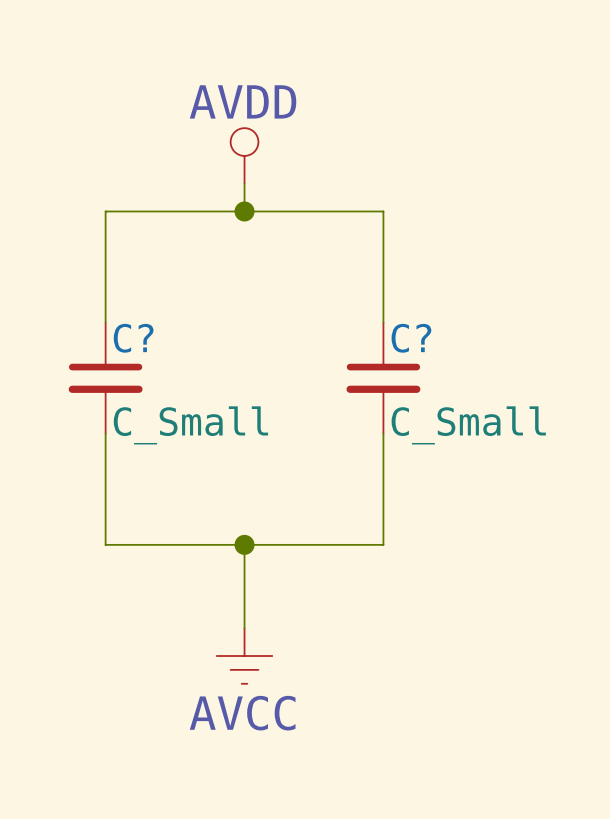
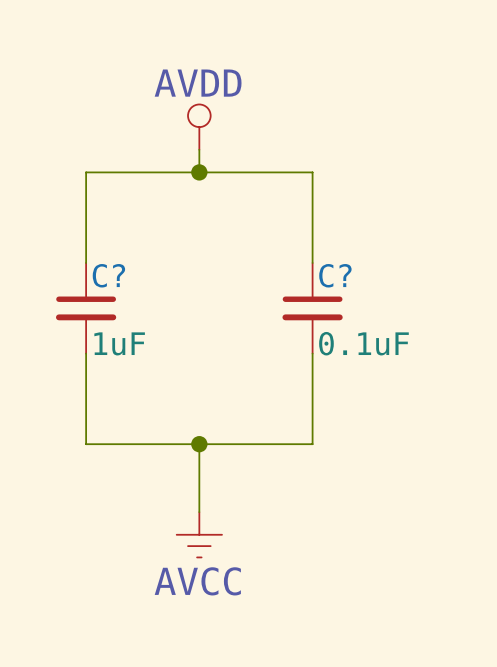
C? value: C_Small (190, 425) -> 1uF (119, 343)
C? value: C_Small (468, 425) -> 0.1uF (363, 343)

